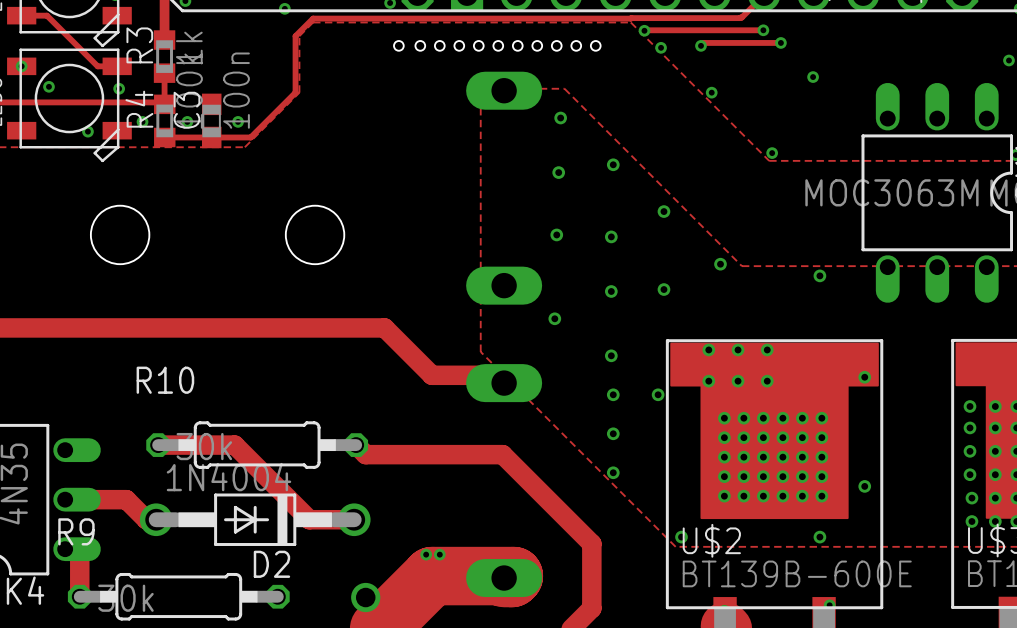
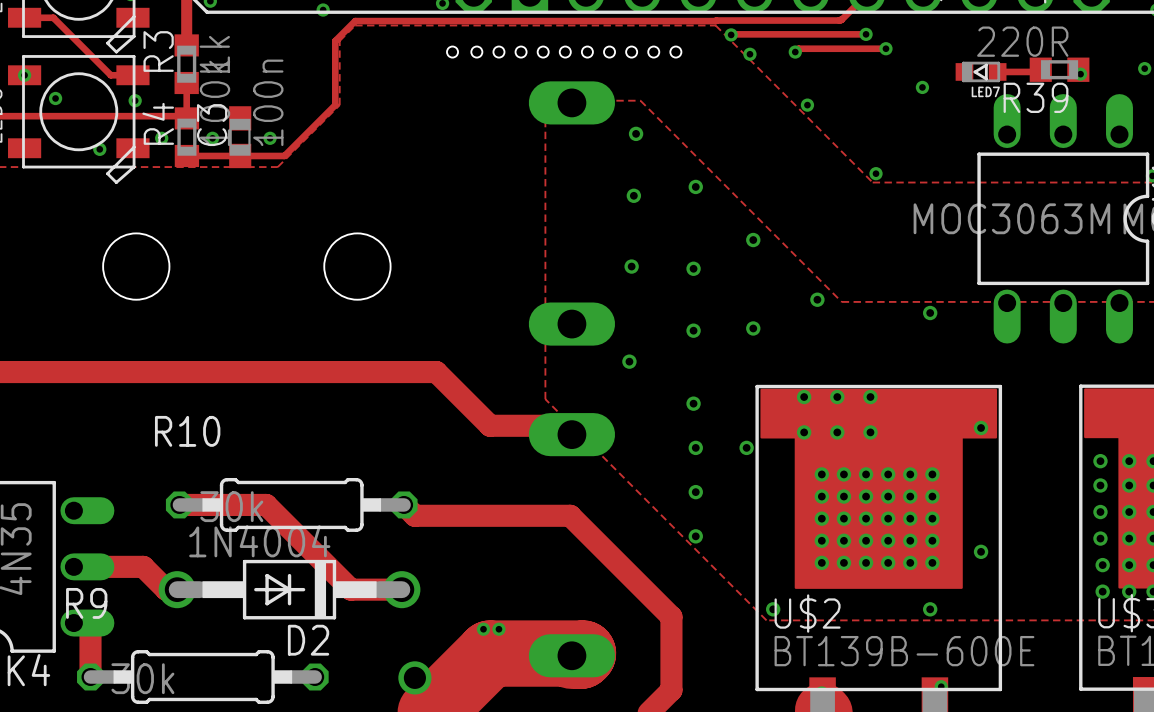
track: none -> (1040, 69) (1038, 71) (997, 71)
R39: none -> 220R (1059, 69)
LED7: none -> (981, 71)
via: none -> (1080, 74)

